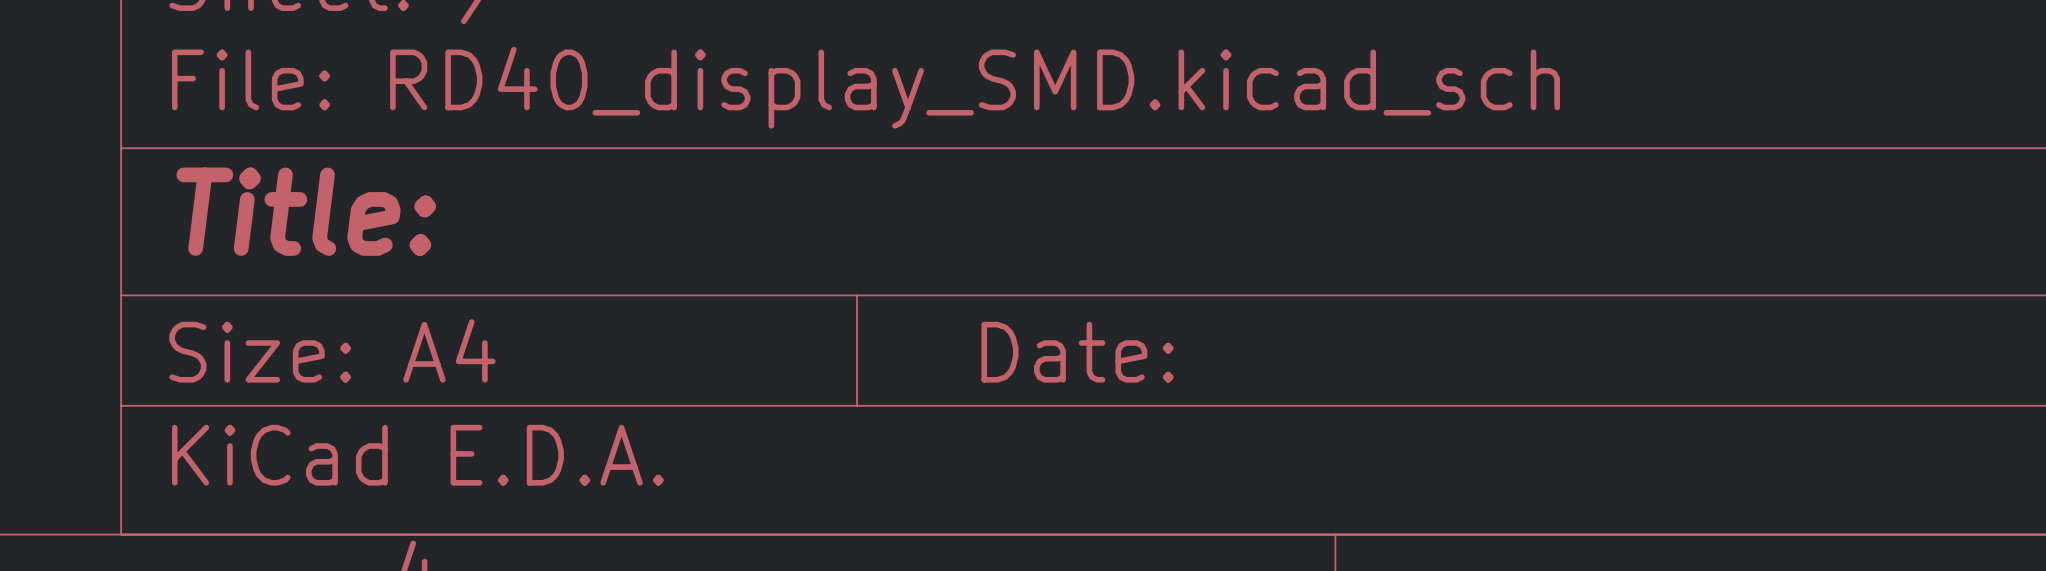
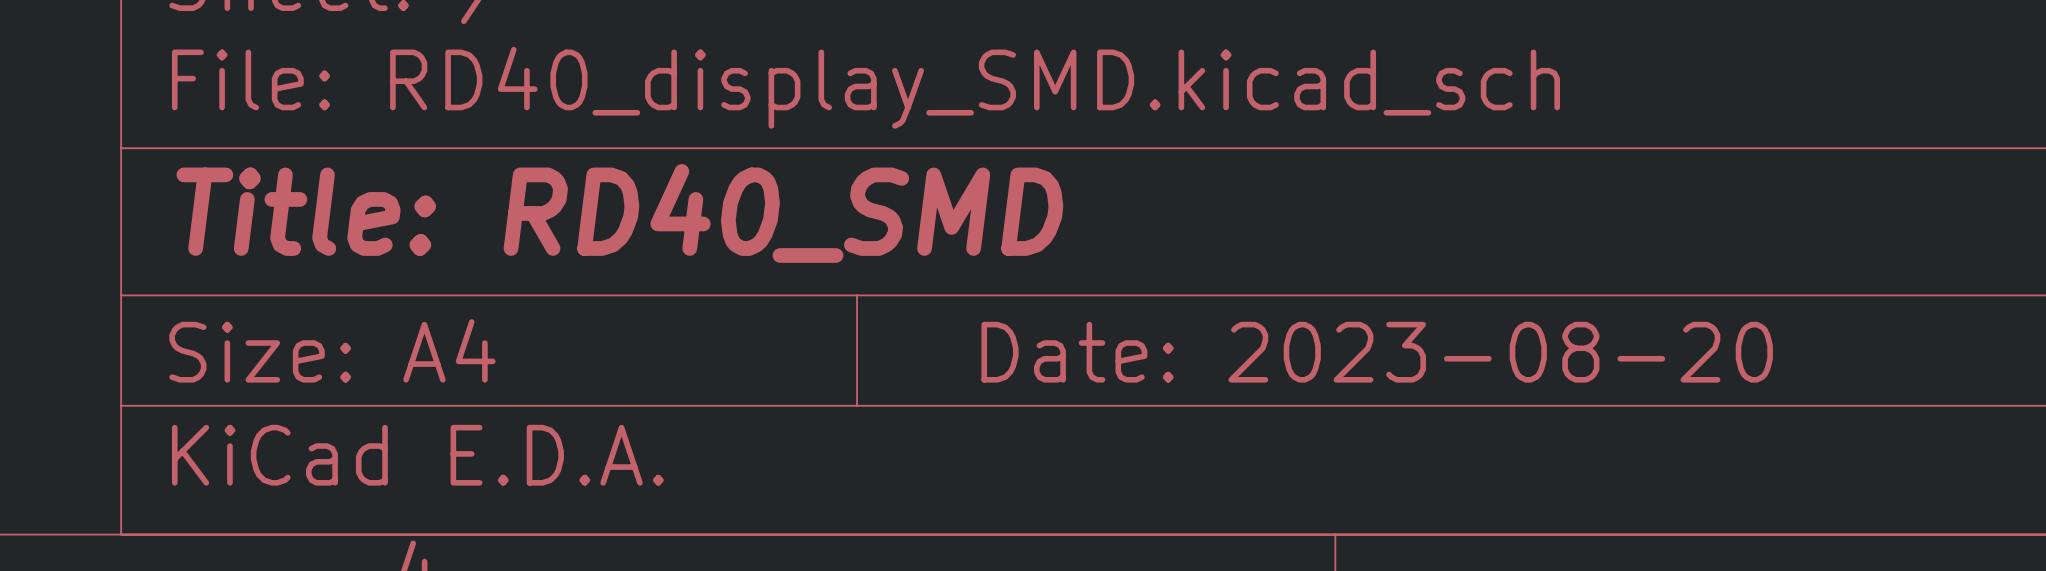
title block: Title: (306, 211) -> Title: RD40_SMD (619, 213)
title block: Date: (1077, 352) -> Date: 2023-08-20 (1377, 352)

